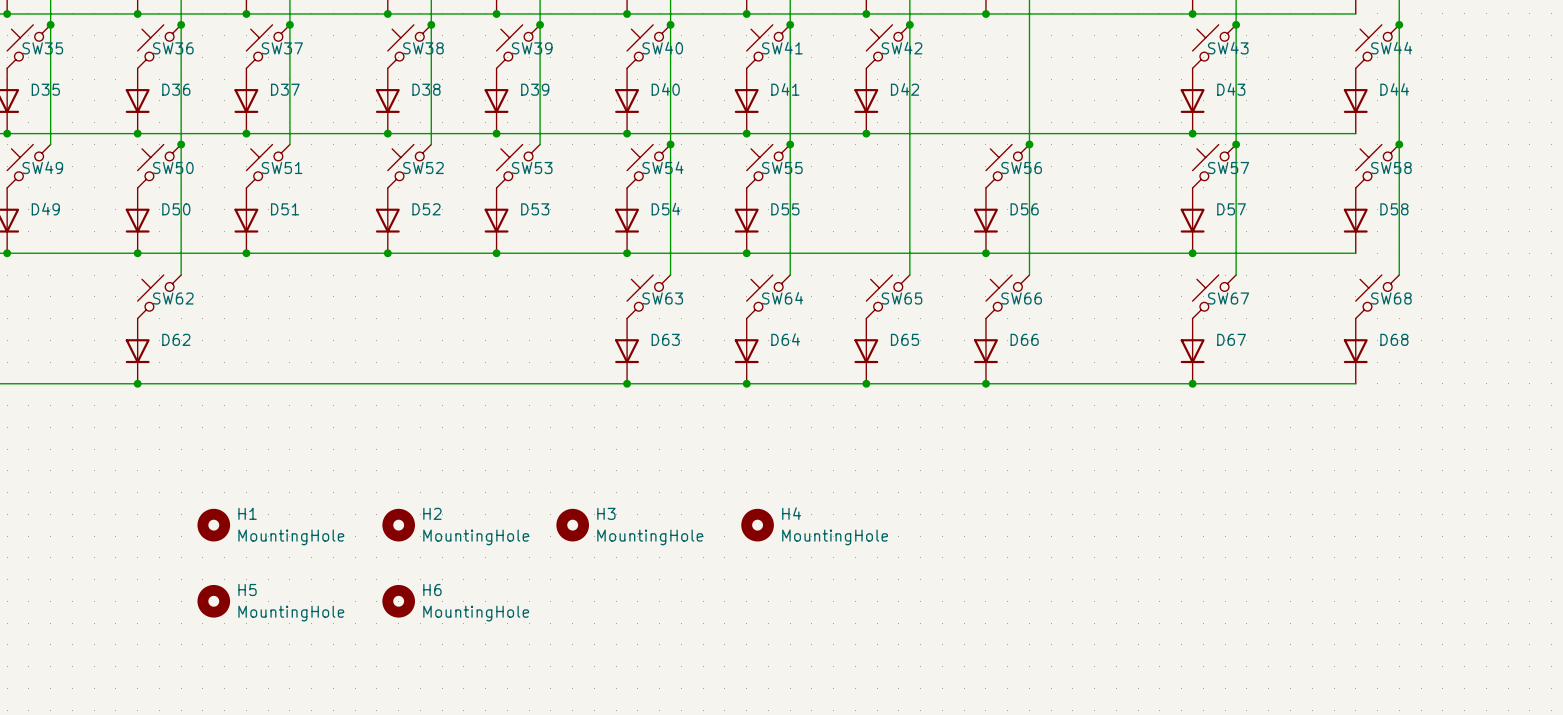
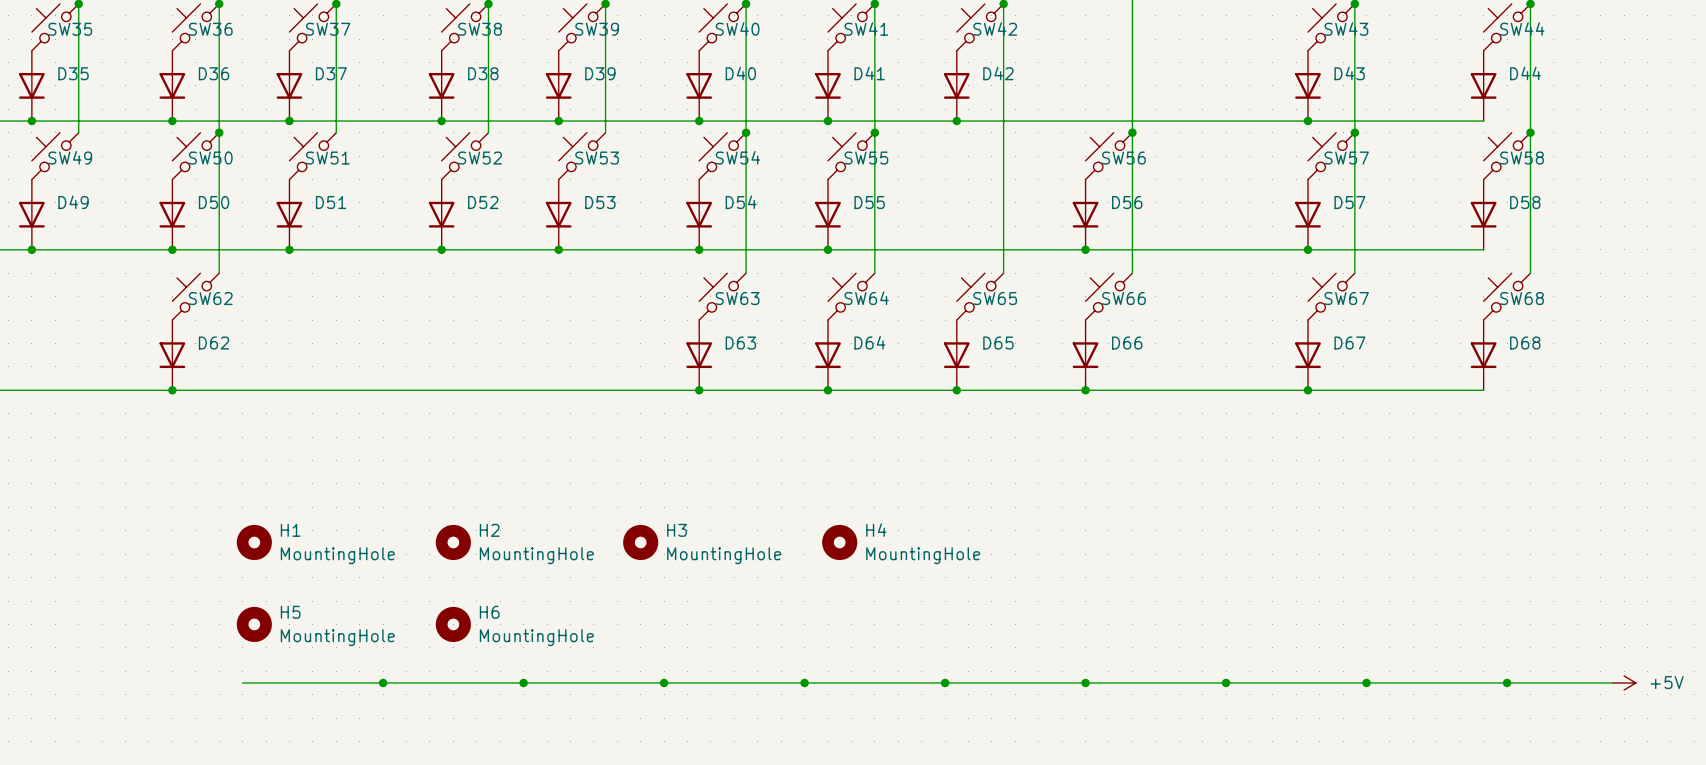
wire: none -> (242, 682) (1612, 682)
junction: none -> (383, 682)
junction: none -> (523, 682)
junction: none -> (664, 682)
junction: none -> (804, 682)
junction: none -> (945, 682)
junction: none -> (1085, 682)
junction: none -> (1226, 682)
junction: none -> (1366, 682)
junction: none -> (1507, 682)
power symbol: none -> +5V (1624, 682)

